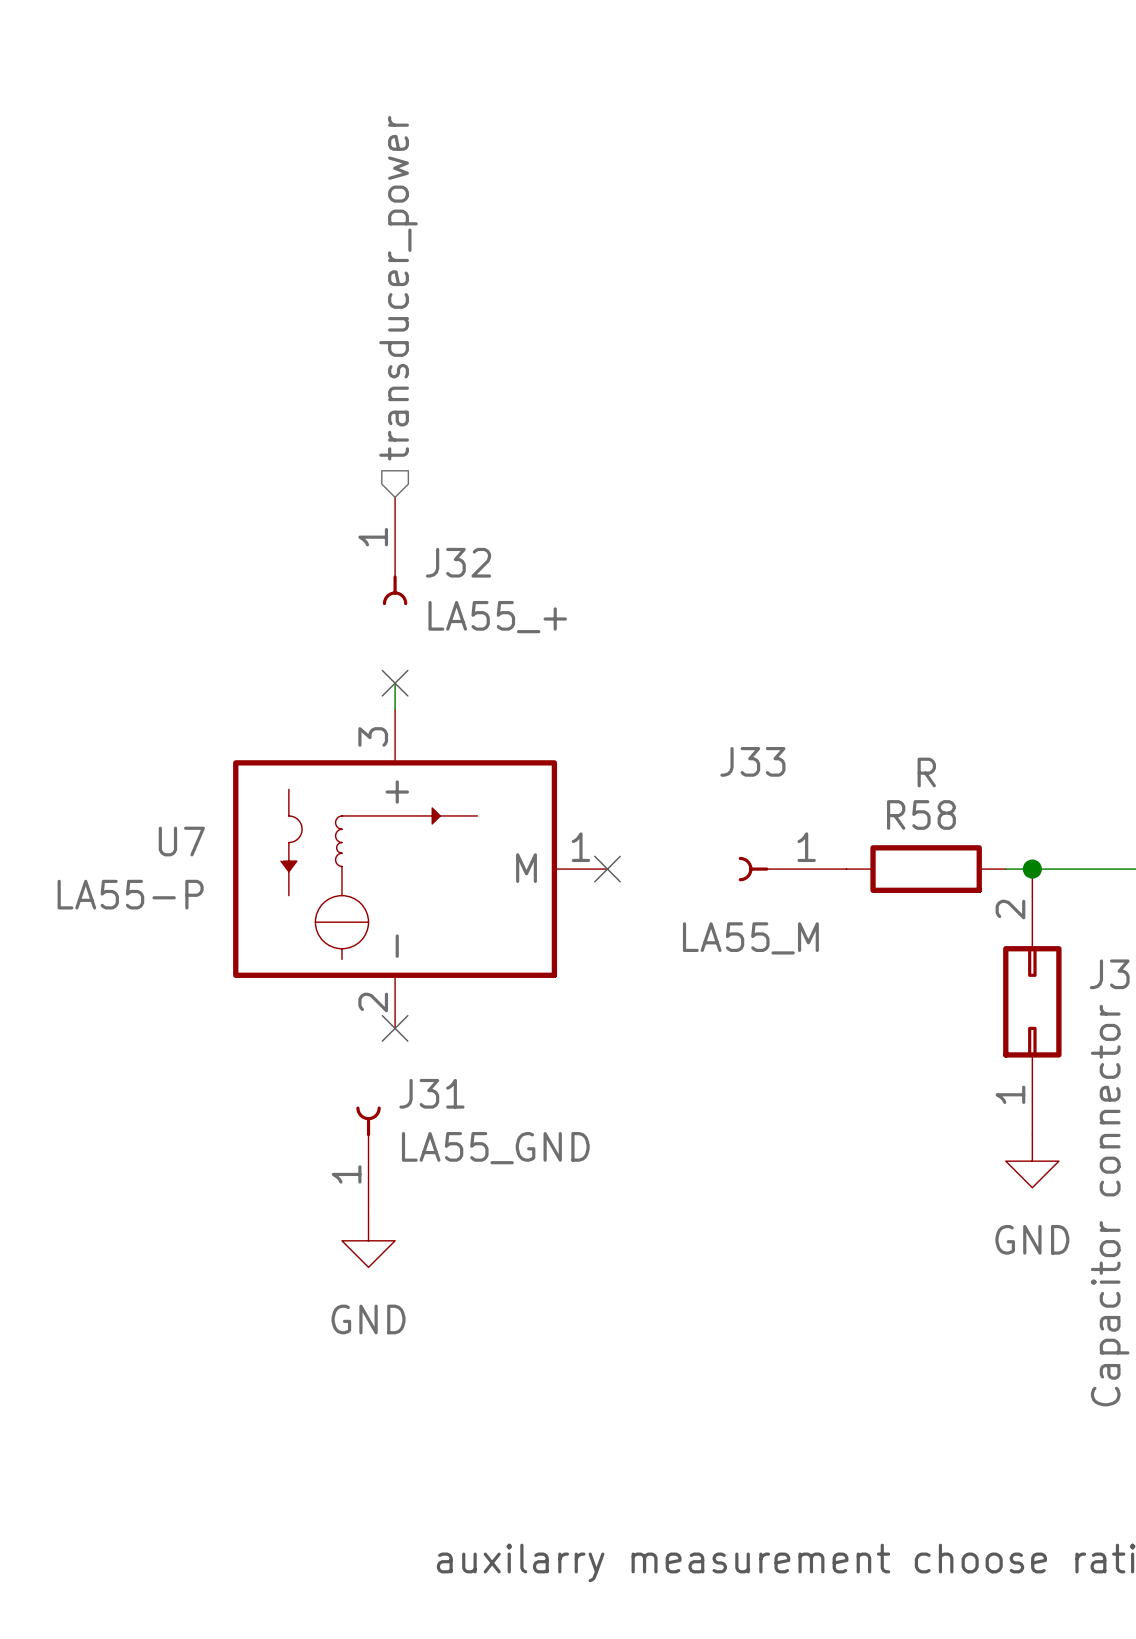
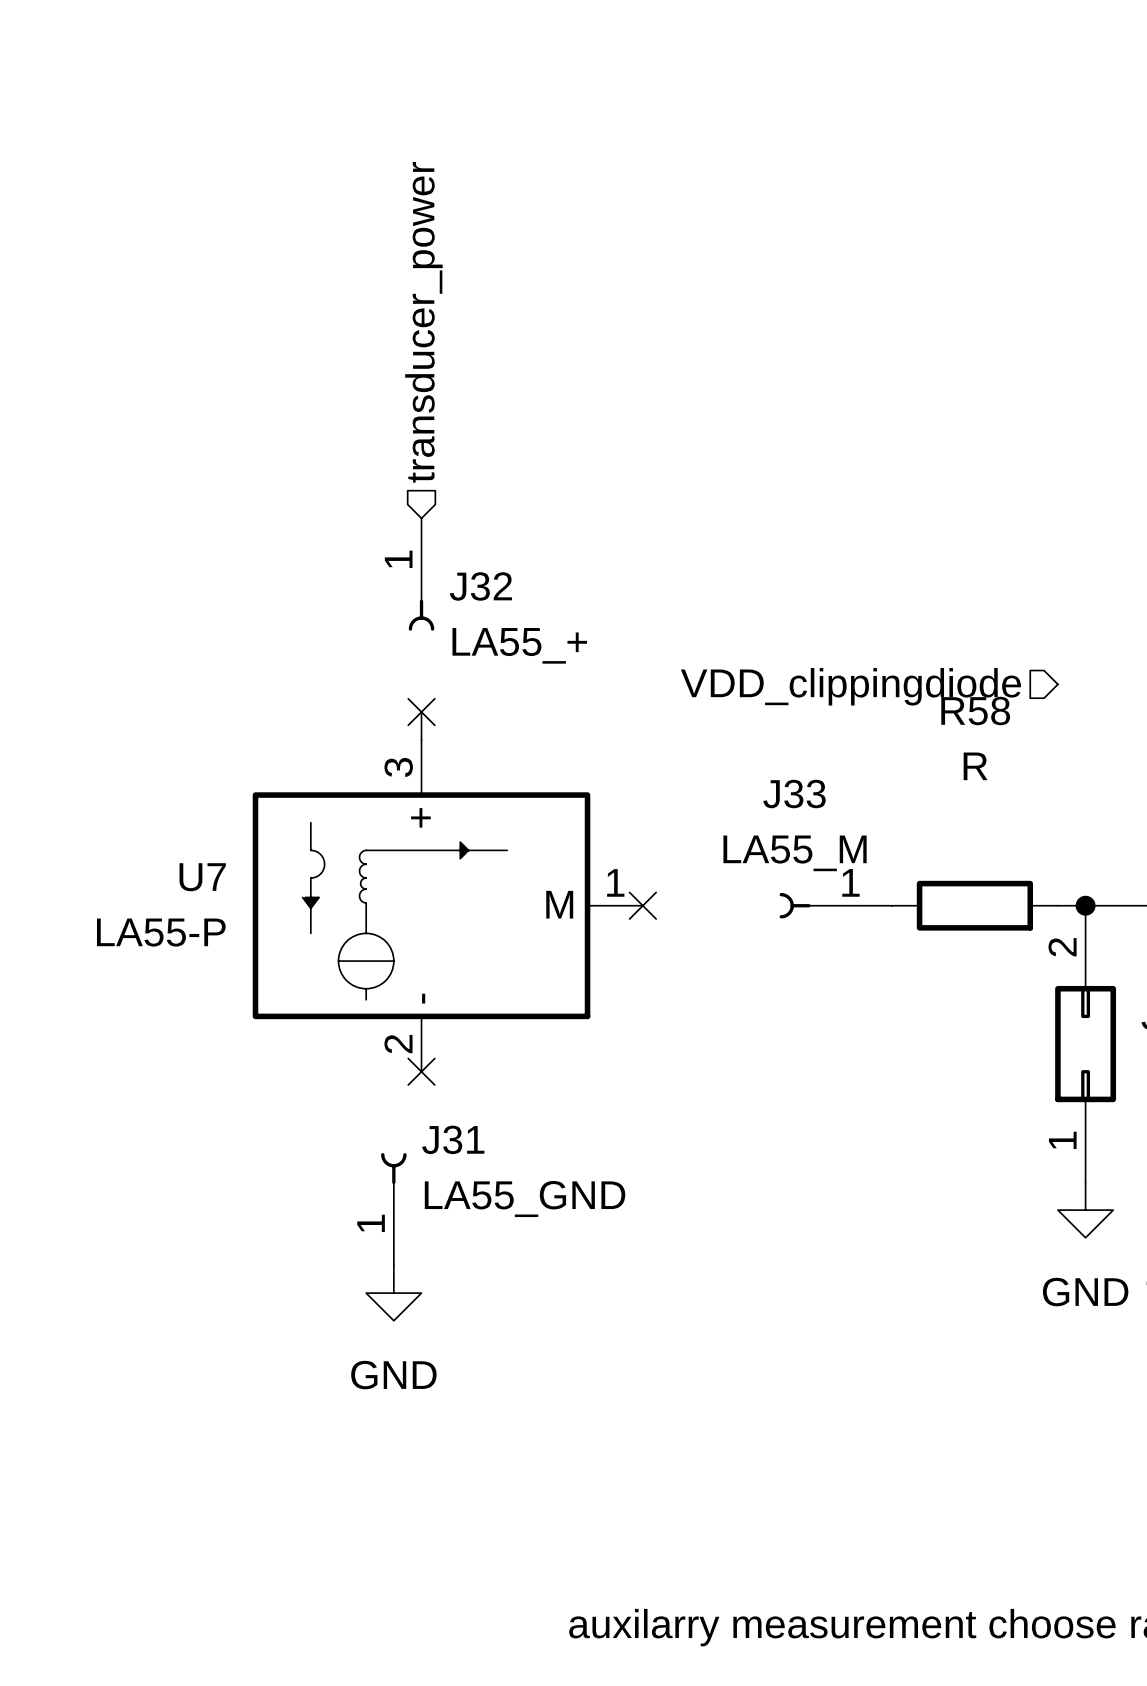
hierarchical label: none -> VDD_clippingdiode (850, 686)
R58 value position: R (926, 772) -> R (975, 766)
R58 name position: R58 (921, 814) -> R58 (975, 711)
J33 value position: LA55_M (750, 938) -> LA55_M (795, 853)

